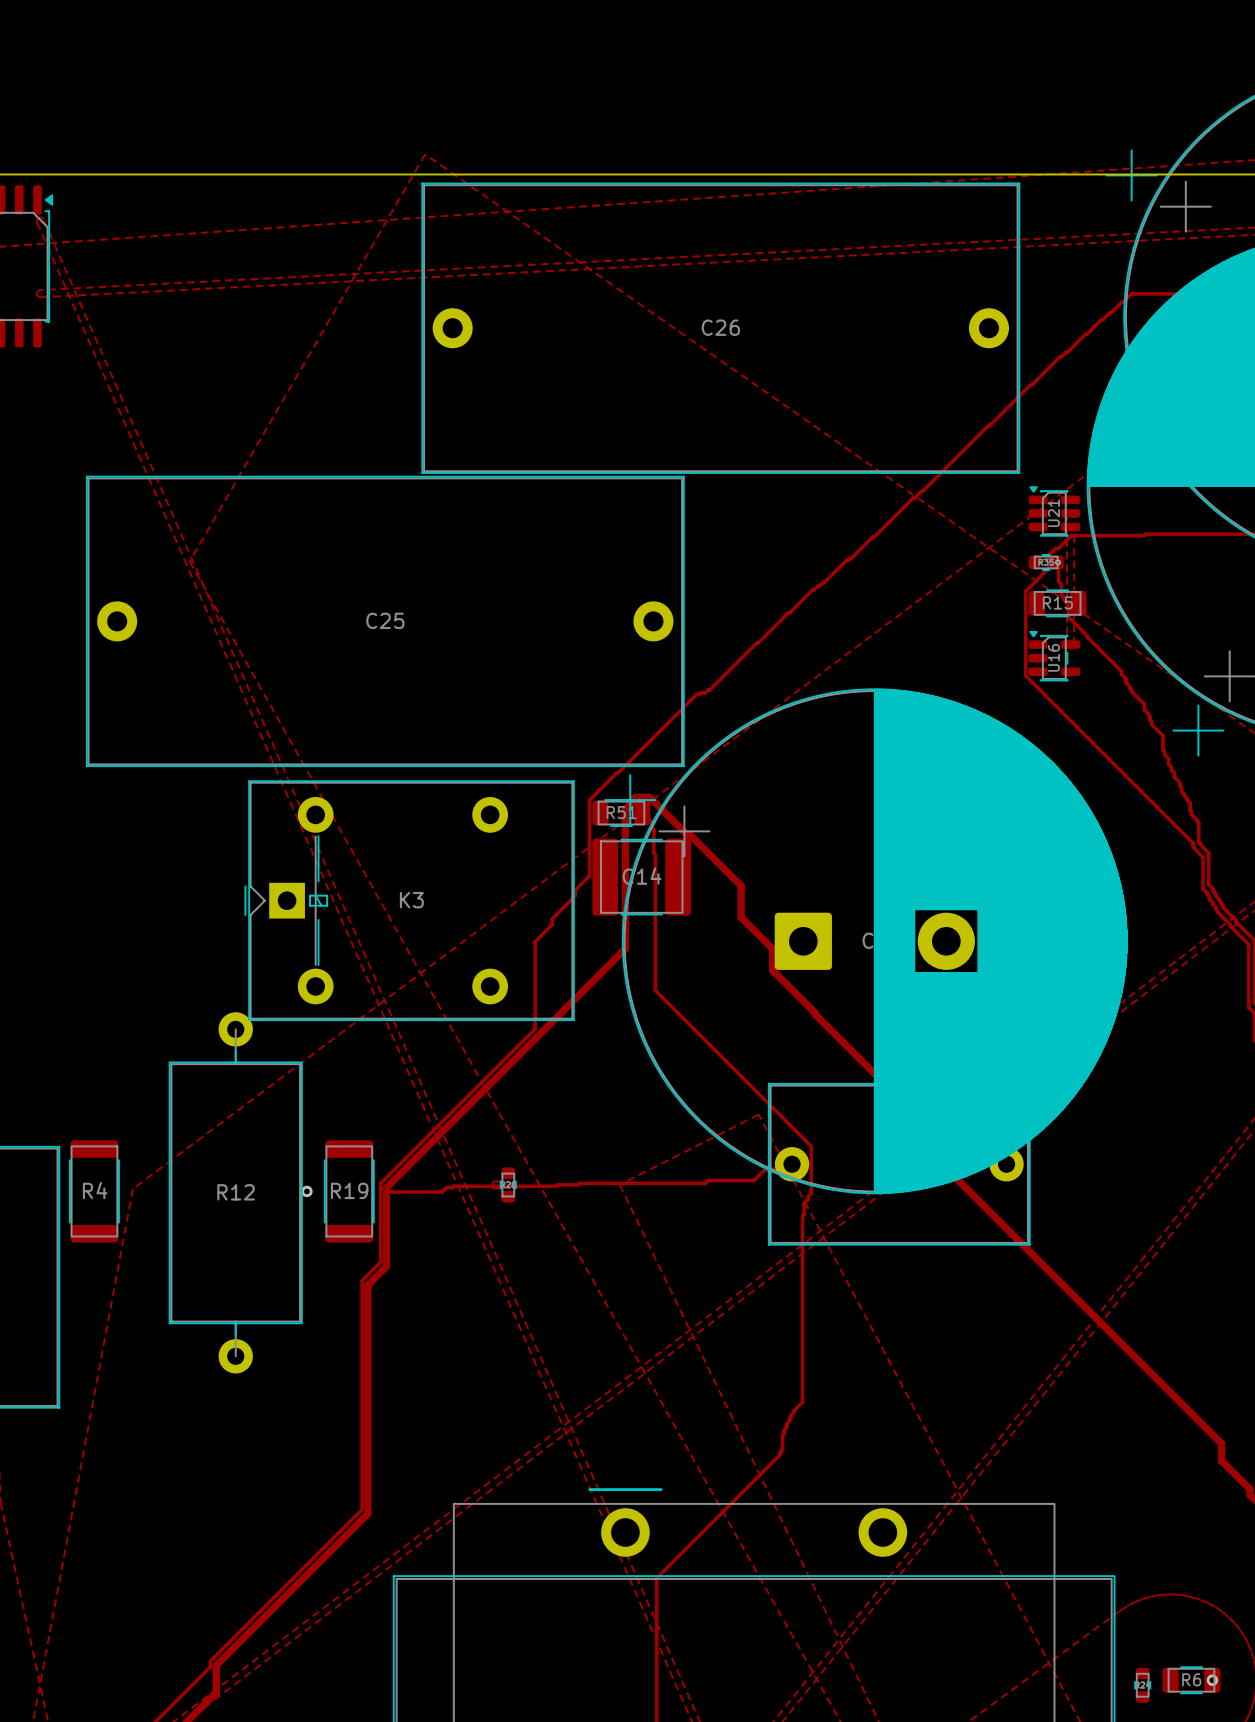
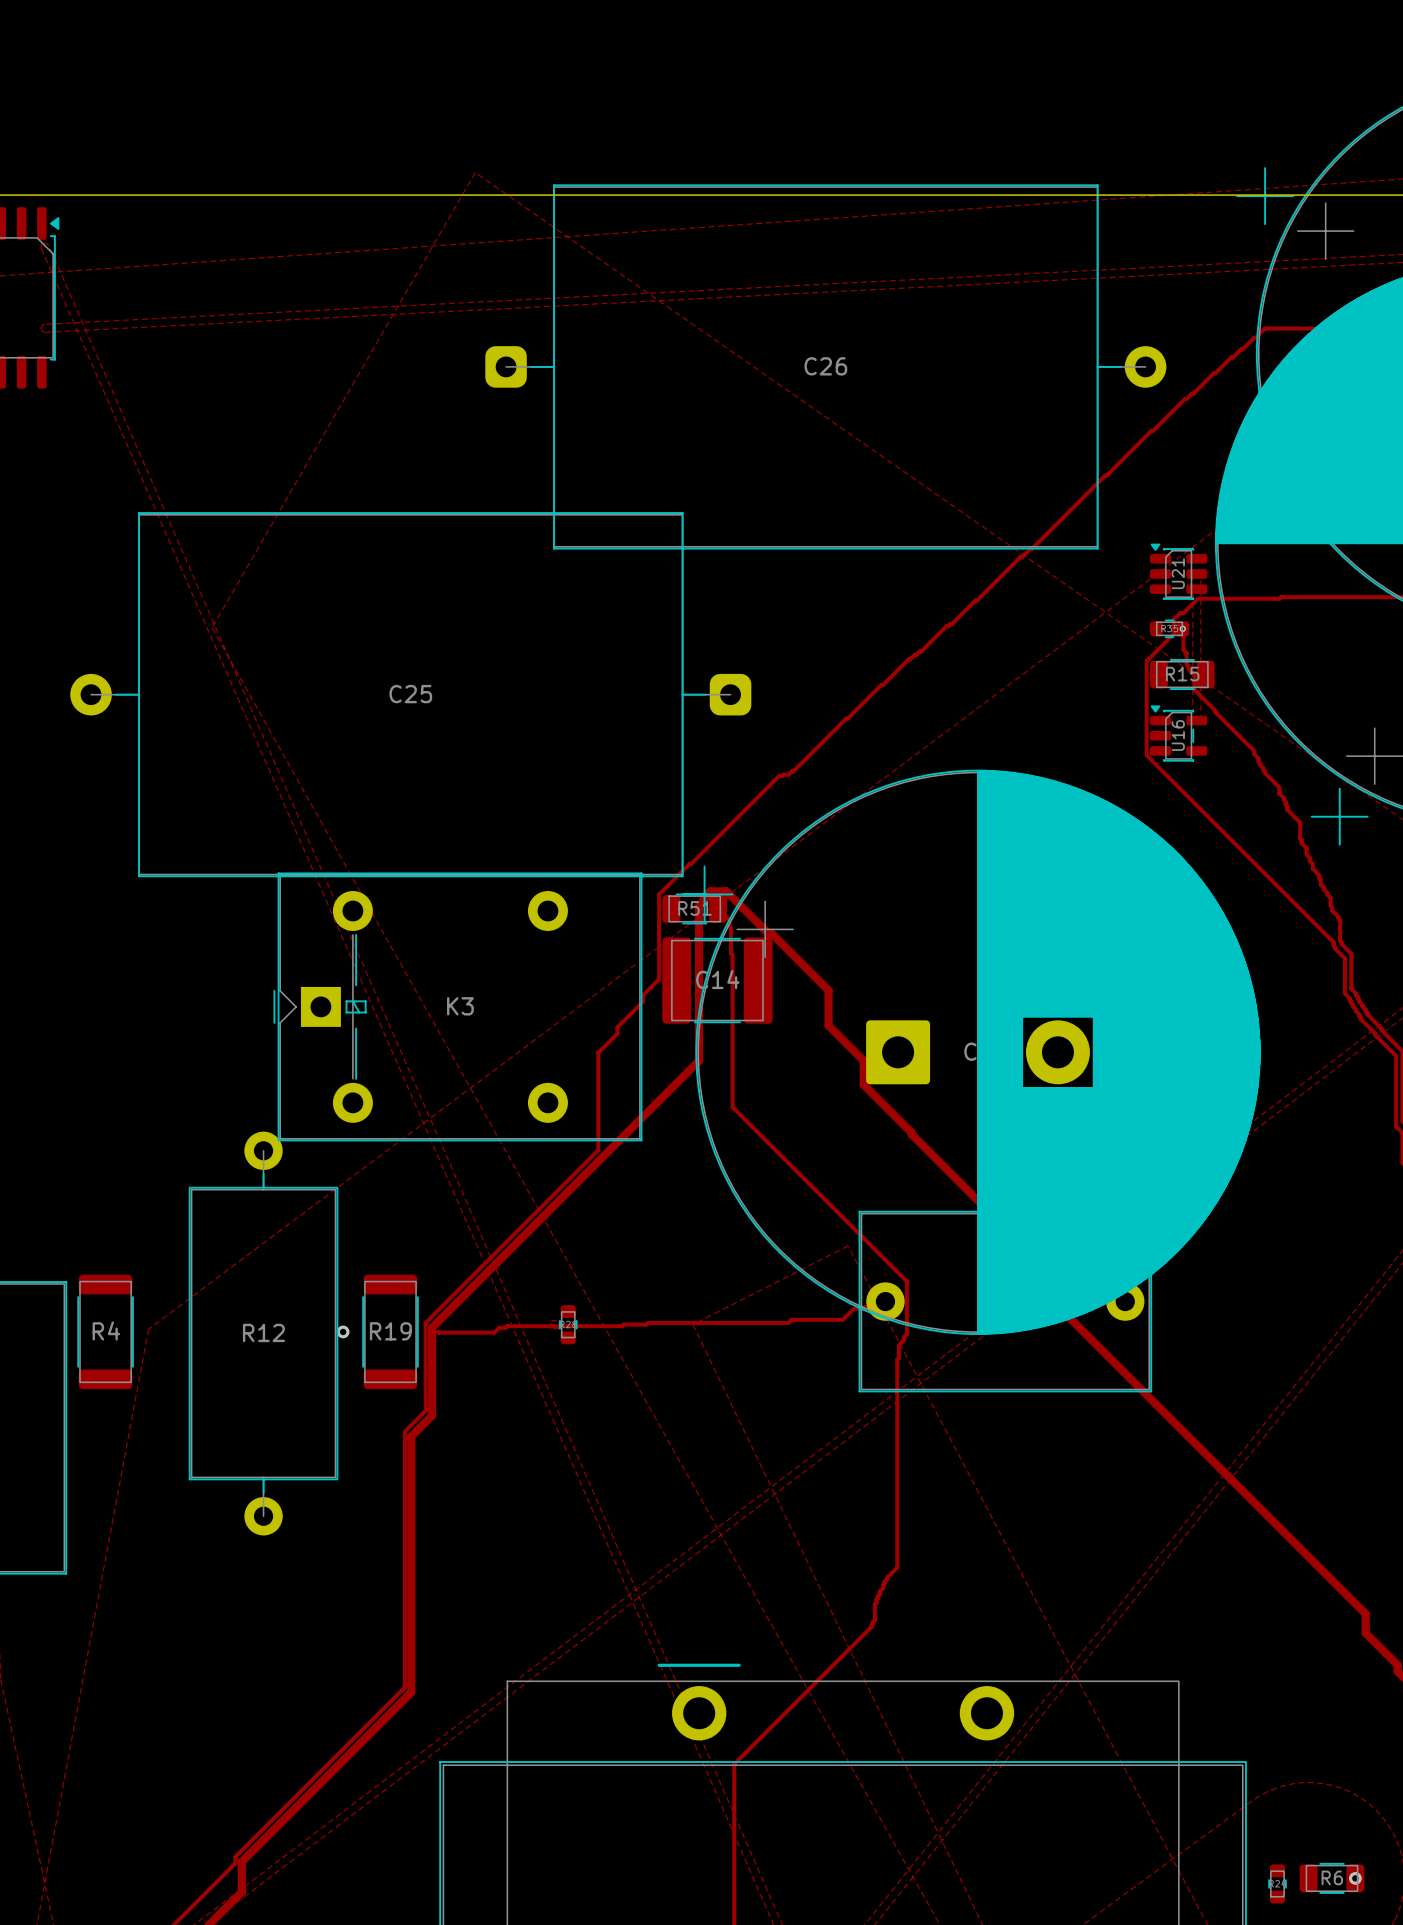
C26 footprint: [421, 182, 1021, 474] -> [485, 184, 1167, 550]
C25 footprint: [86, 475, 685, 767] -> [70, 512, 752, 878]

